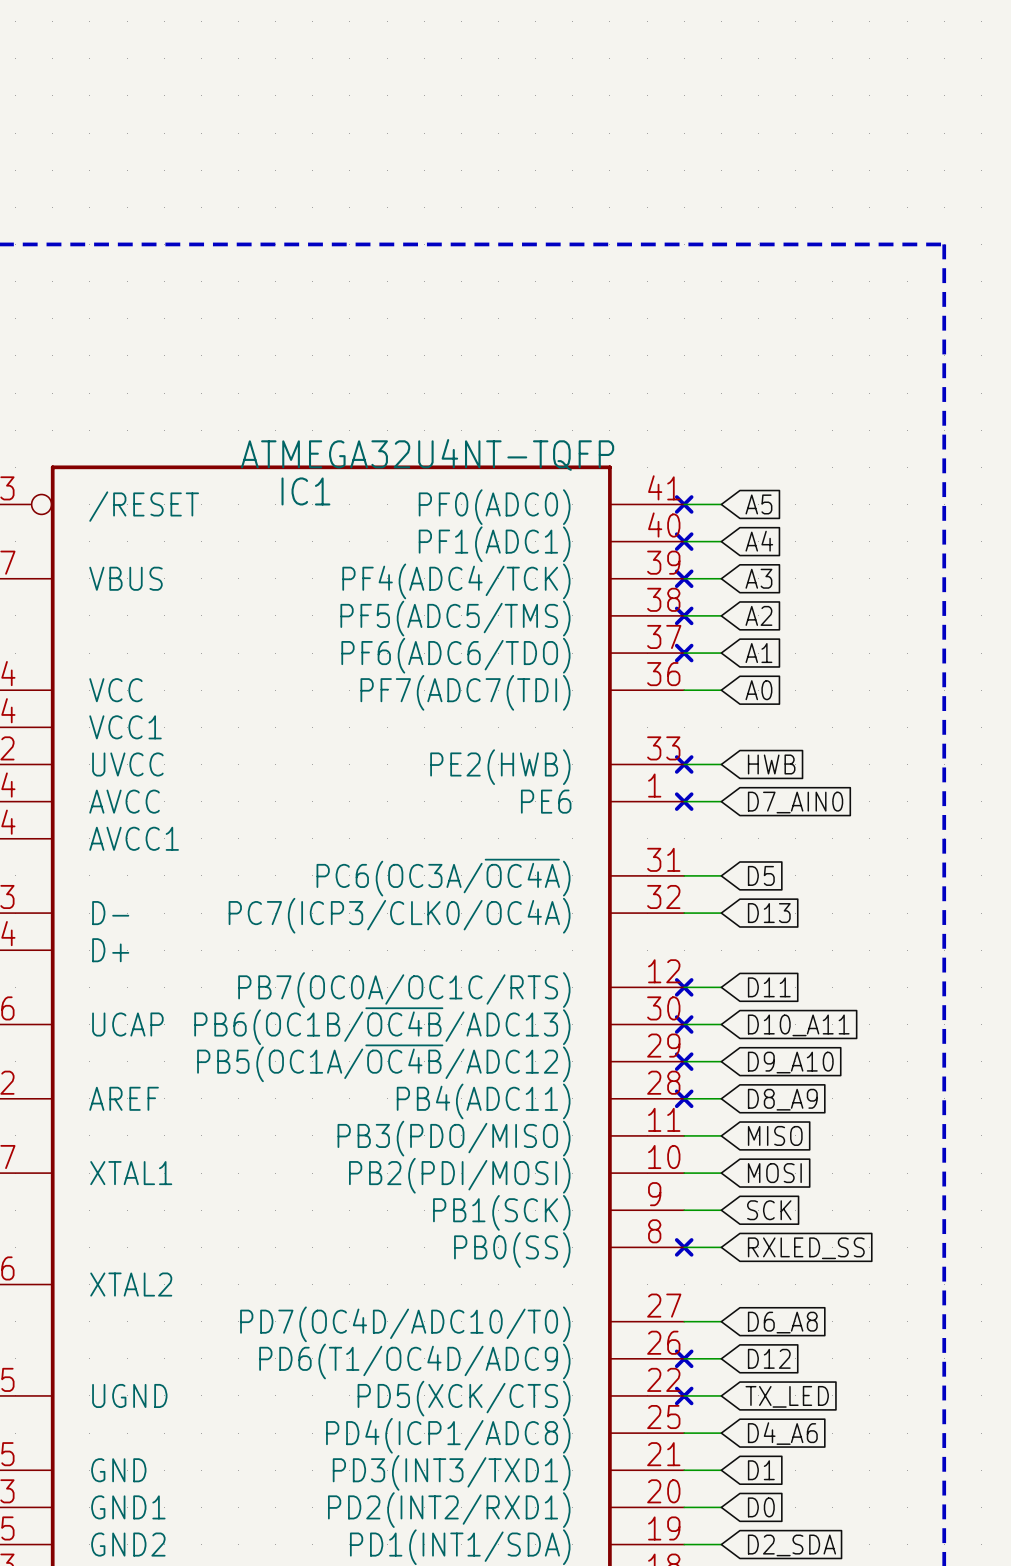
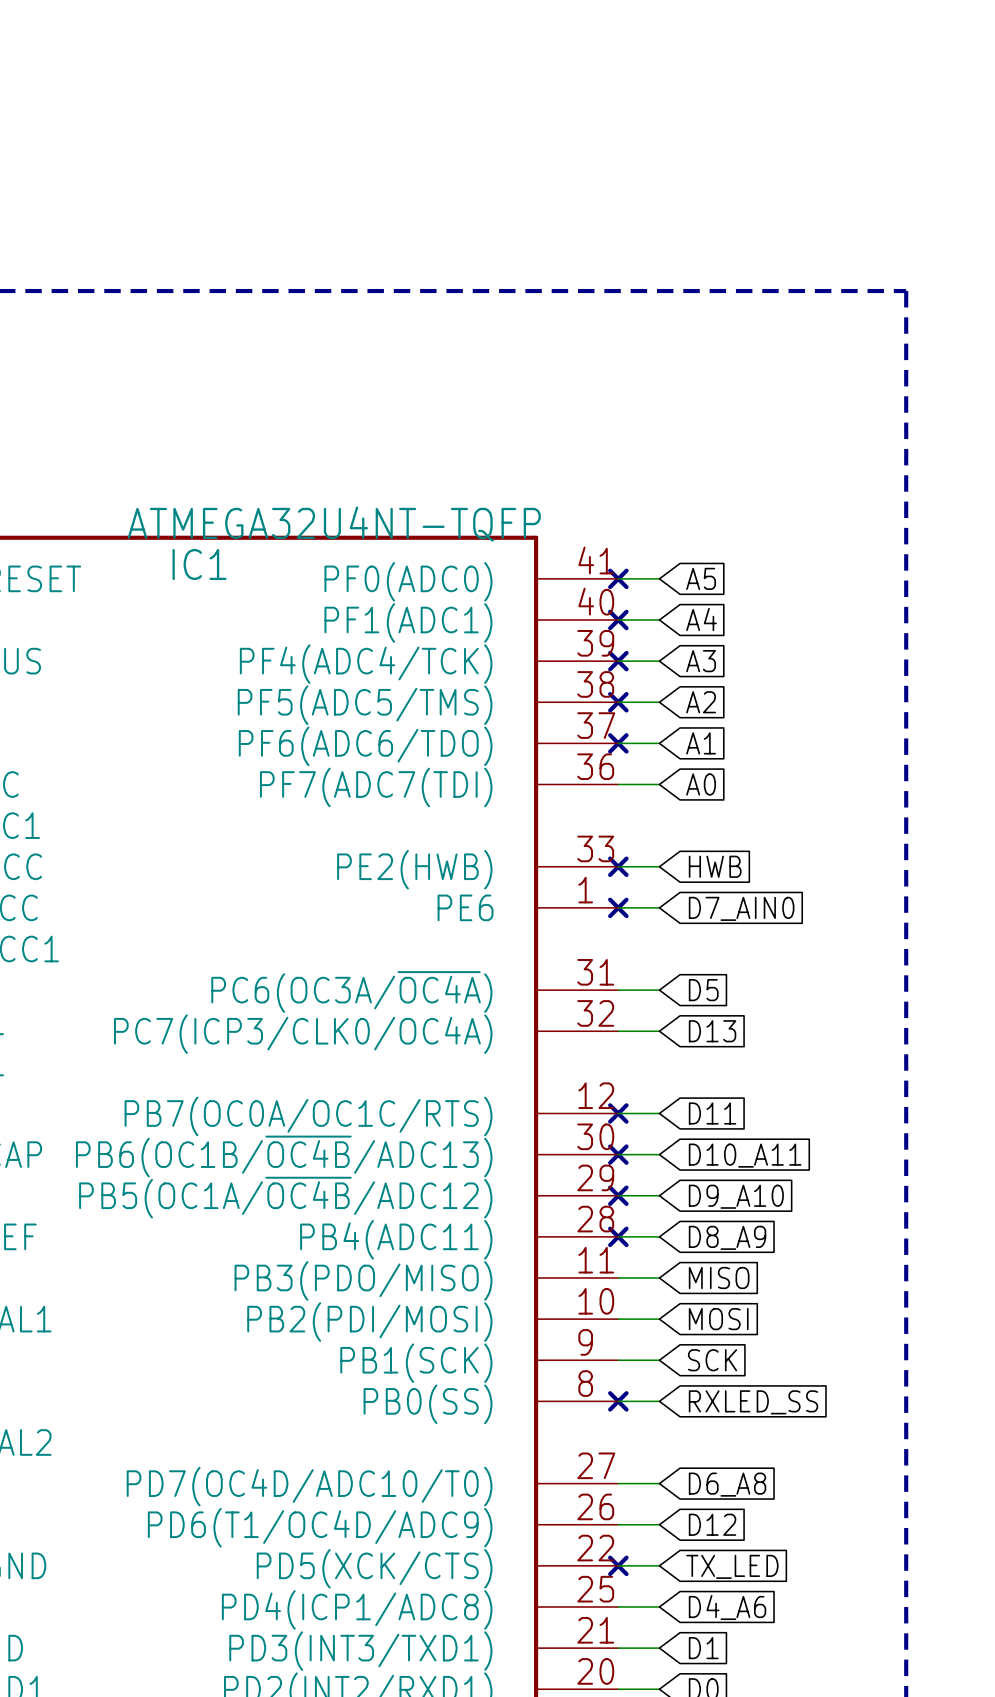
part: (684, 1358) -> none

